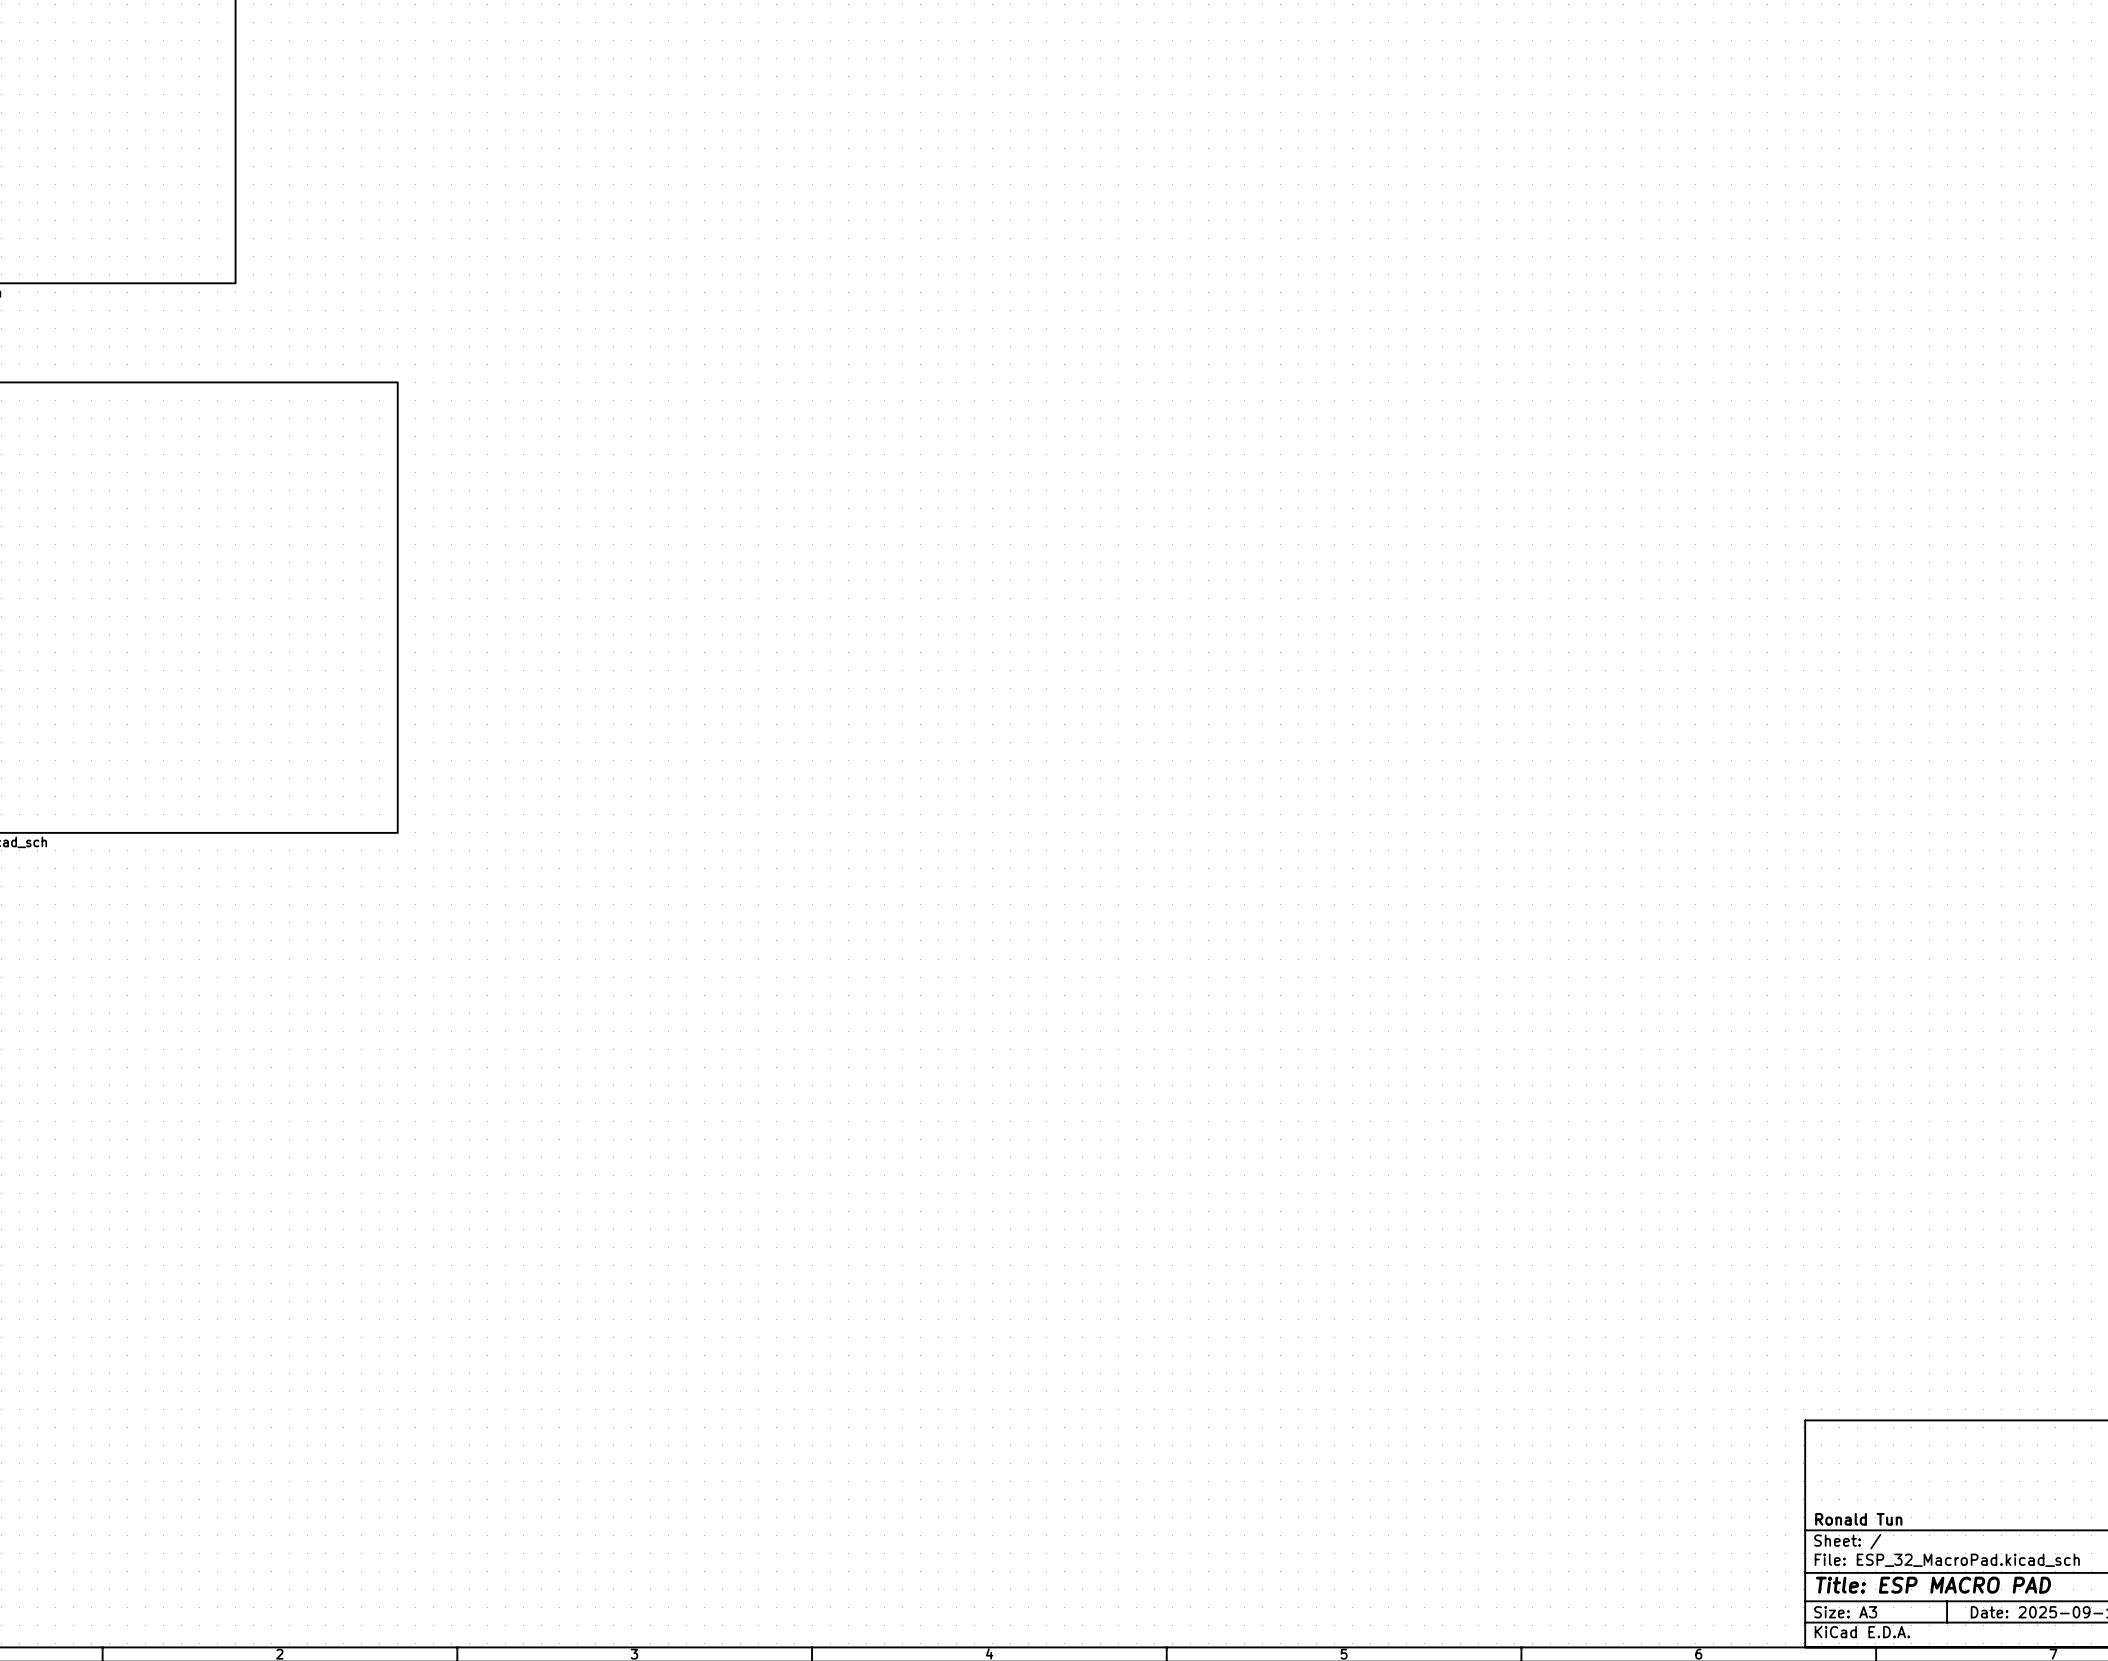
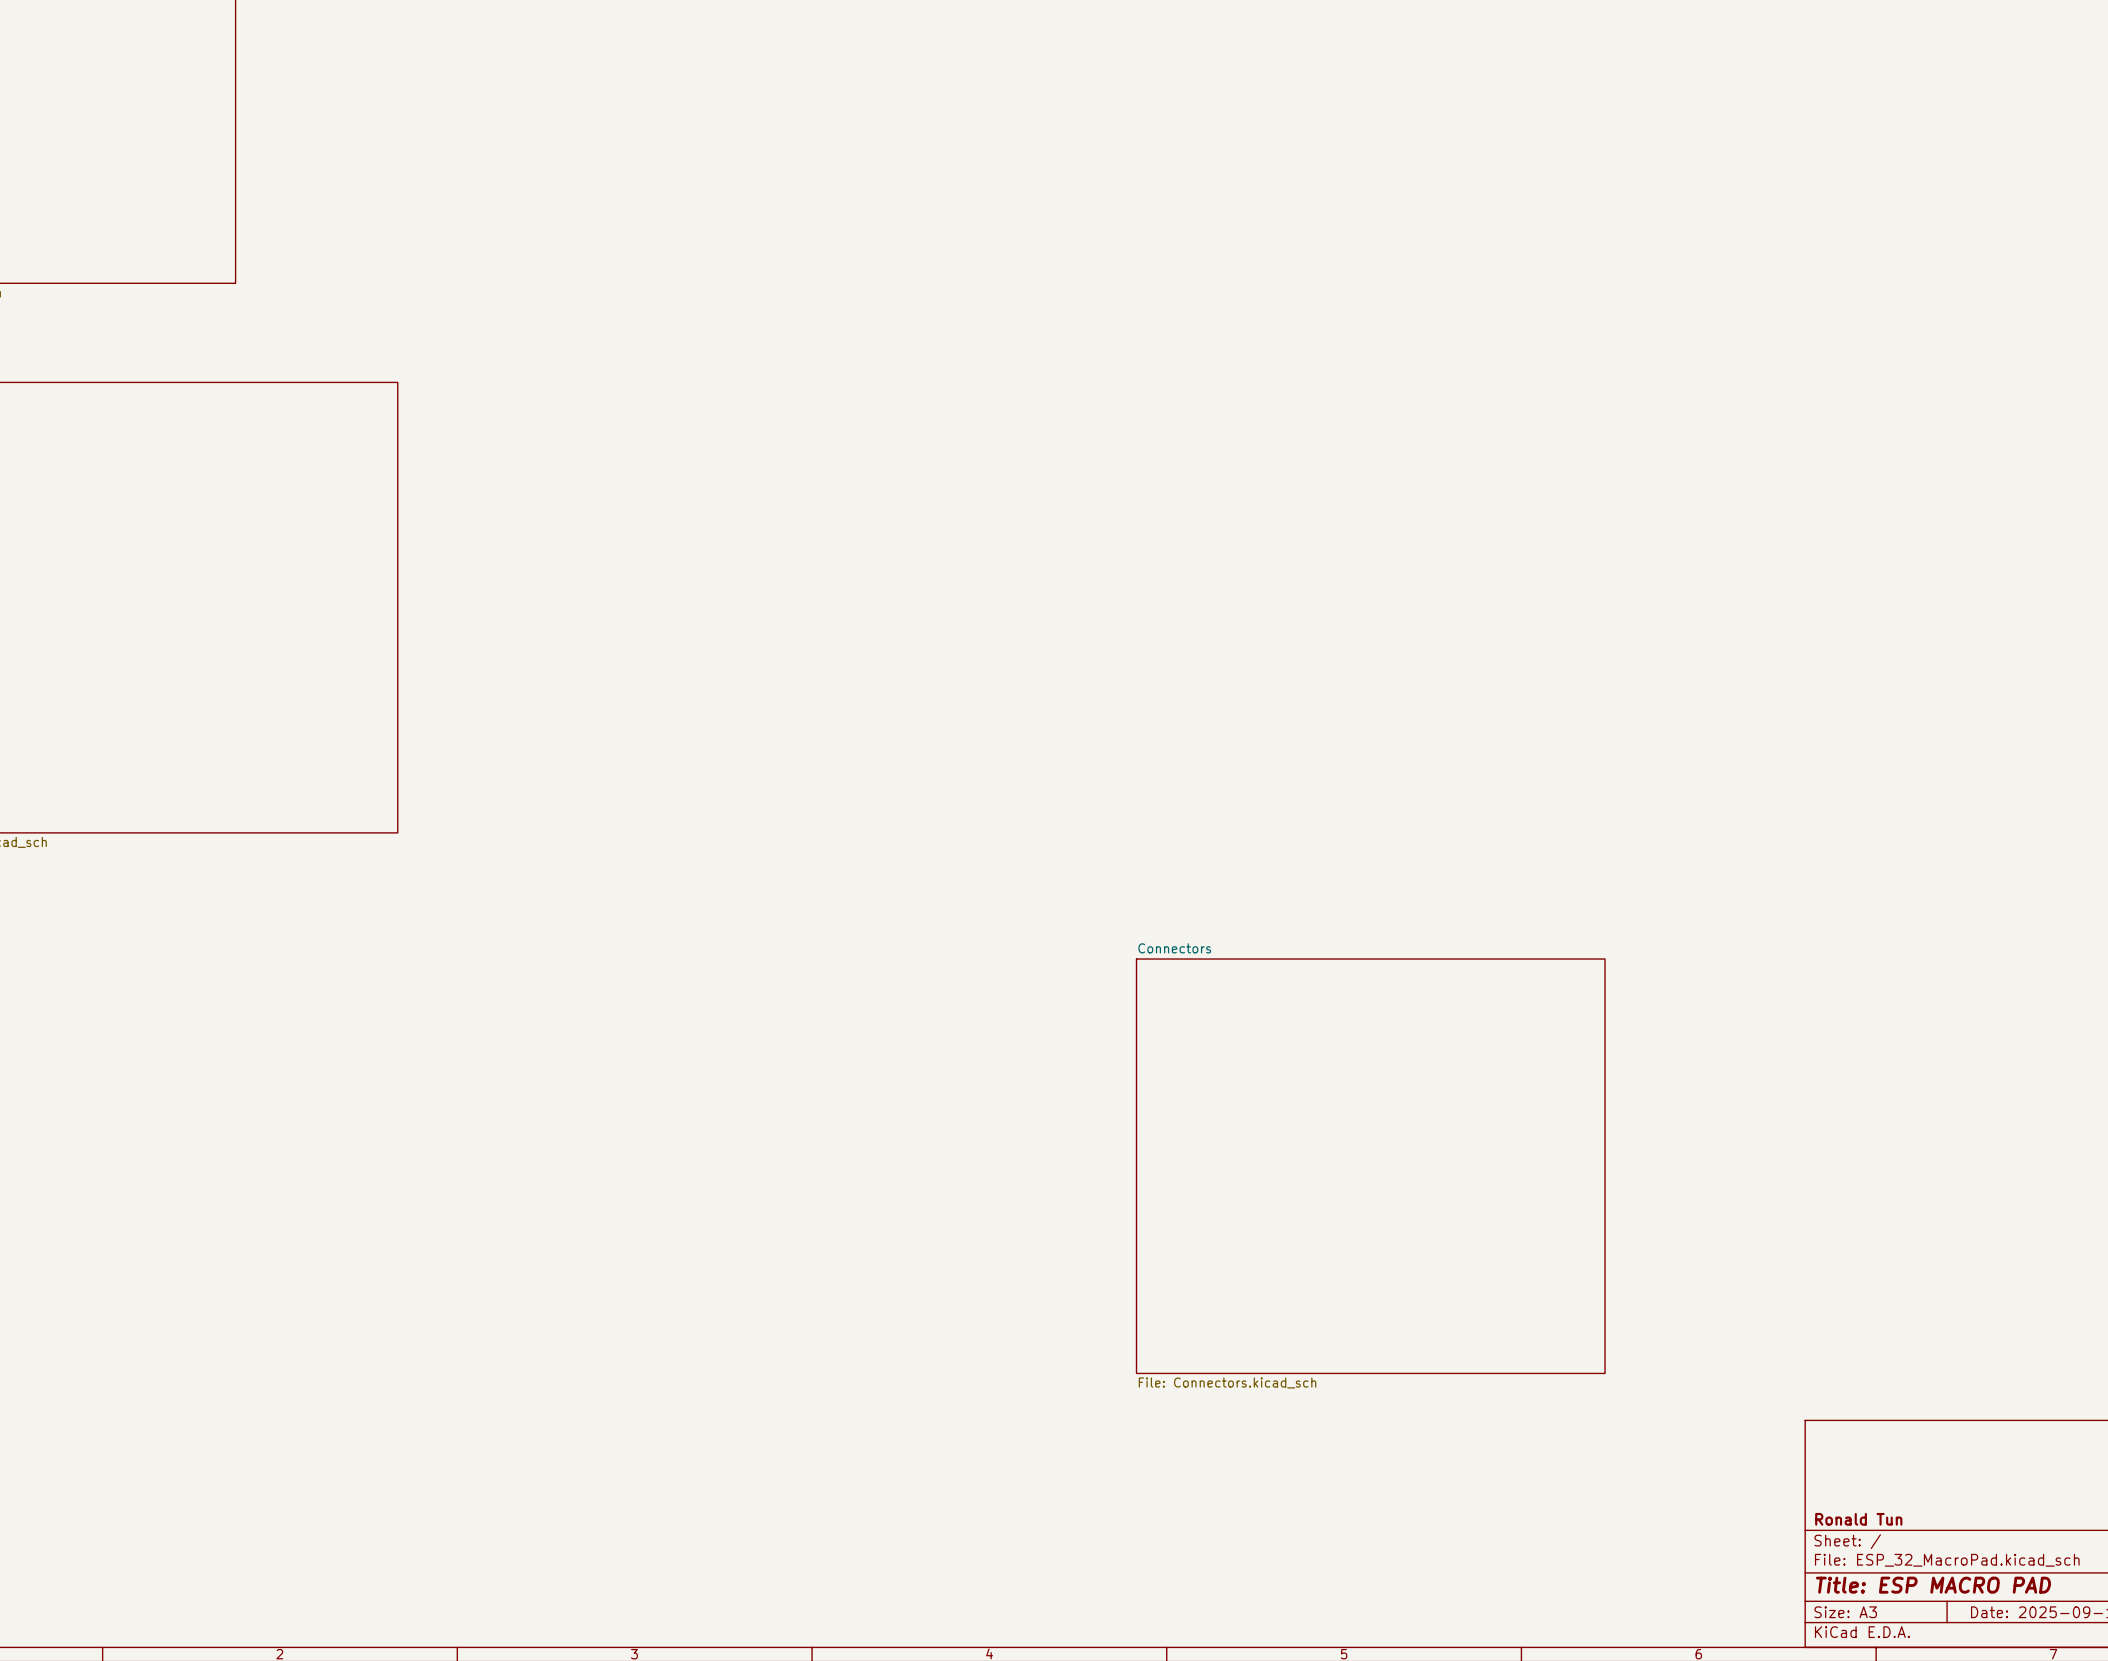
sheet Connectors: none -> File: Connectors.kicad_sch (1370, 1166)

